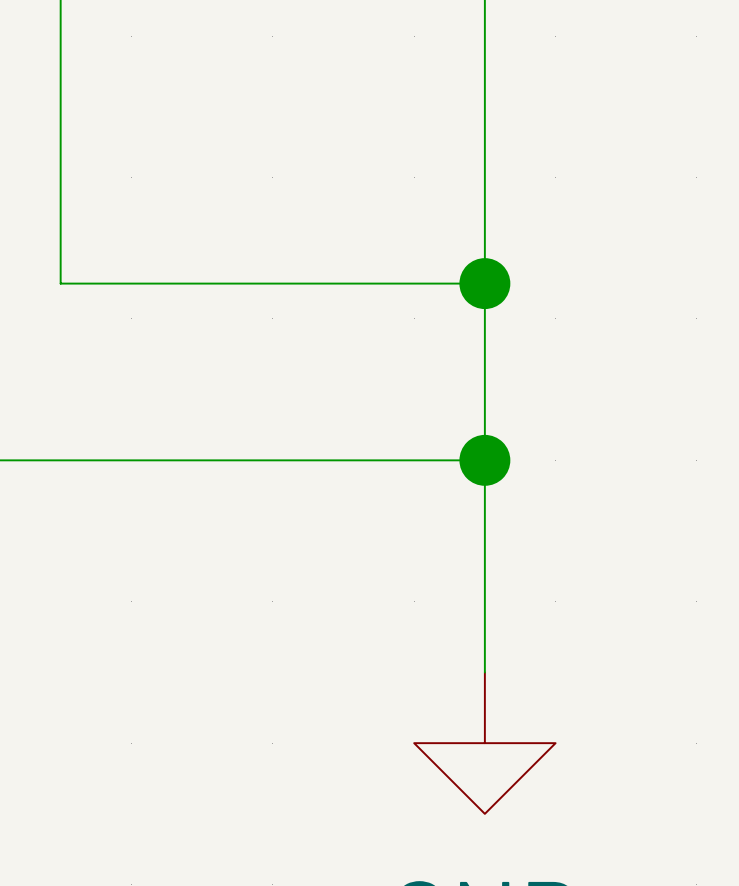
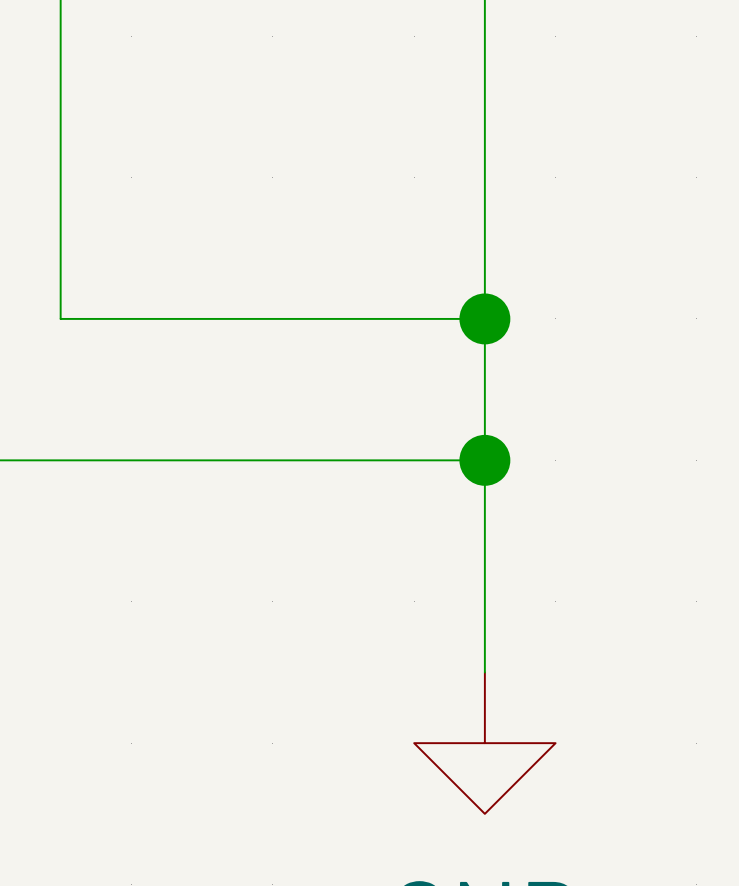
wire: (60, 283) (484, 283) -> (60, 283) (60, 318) (484, 318)
junction position: (484, 283) -> (484, 318)

